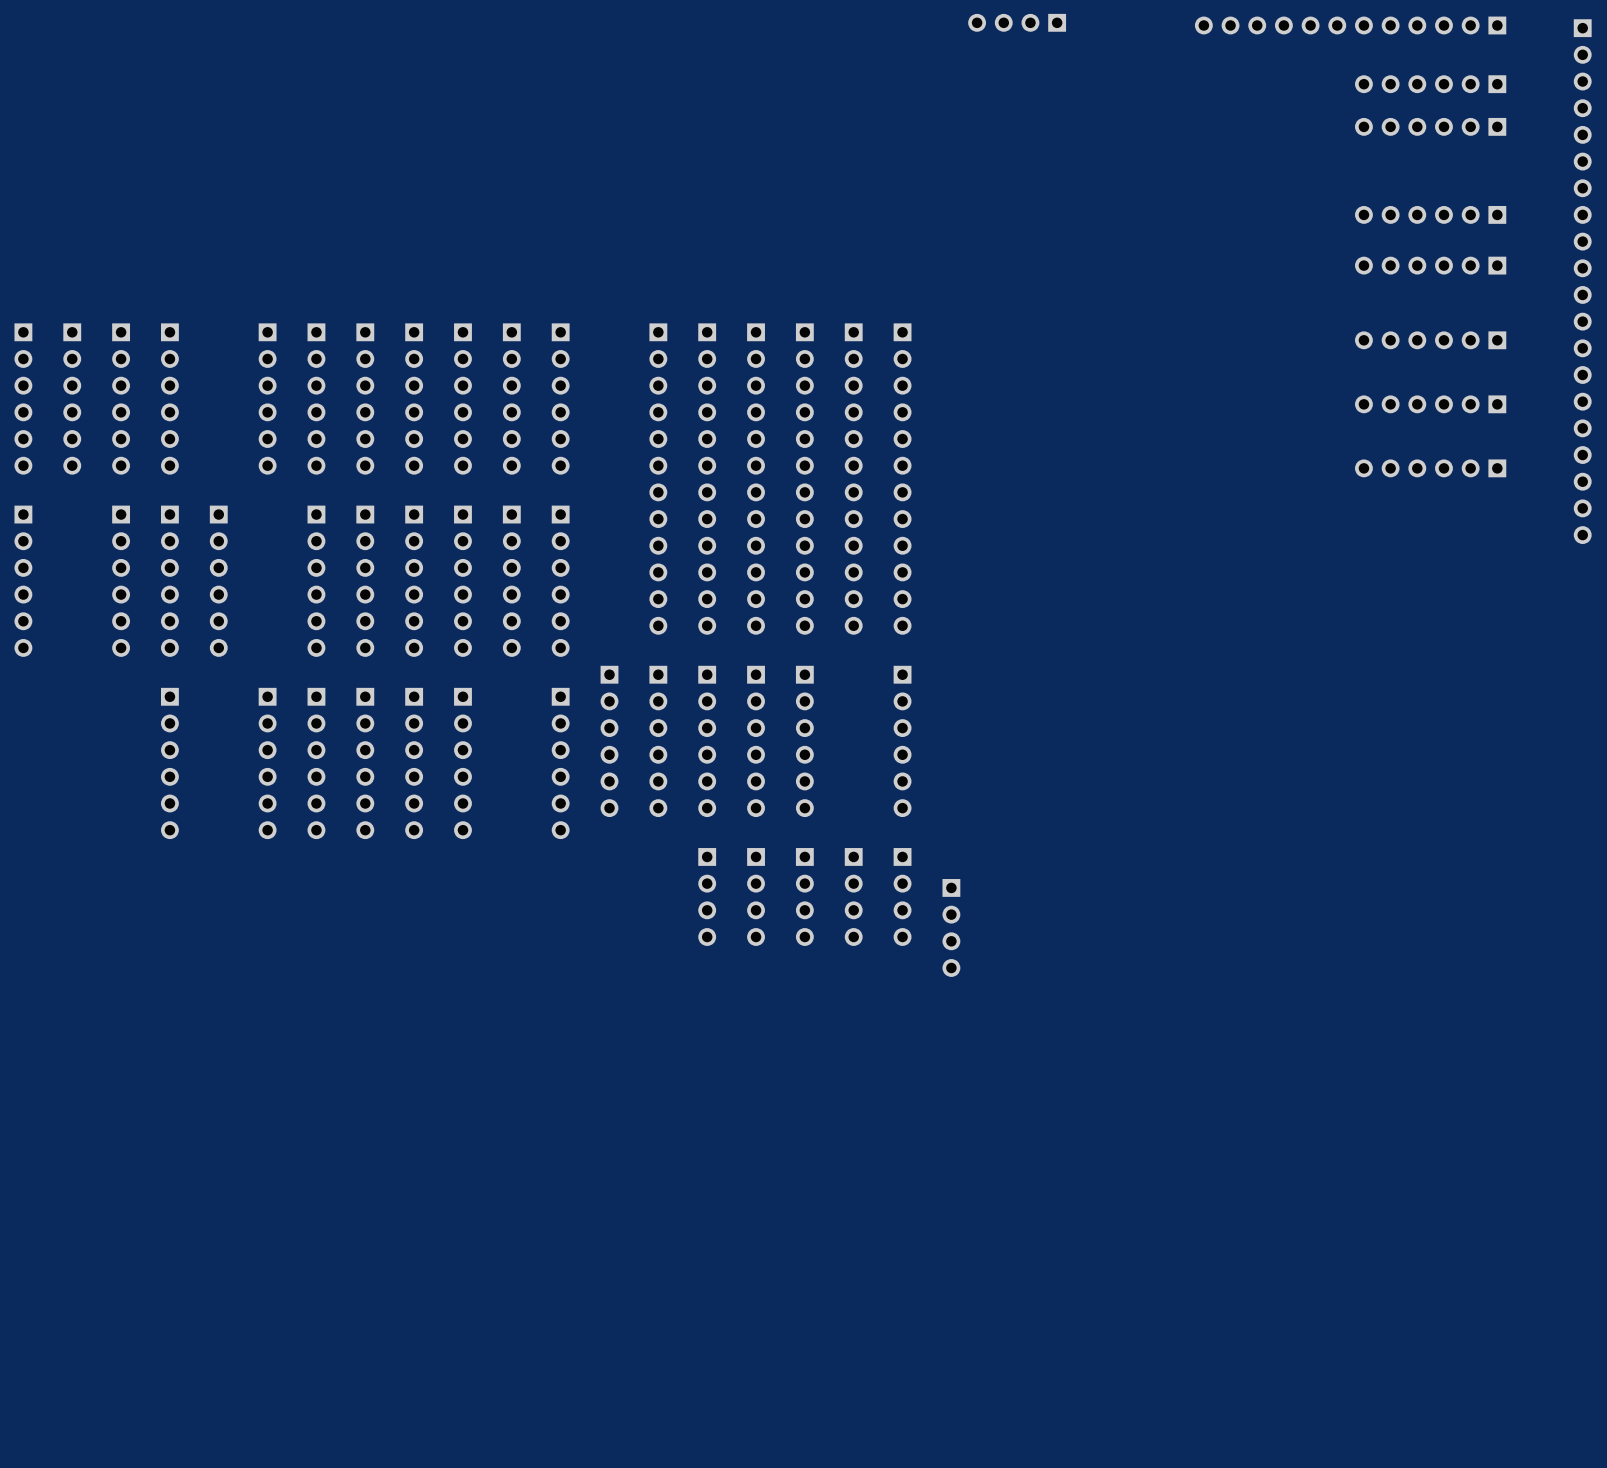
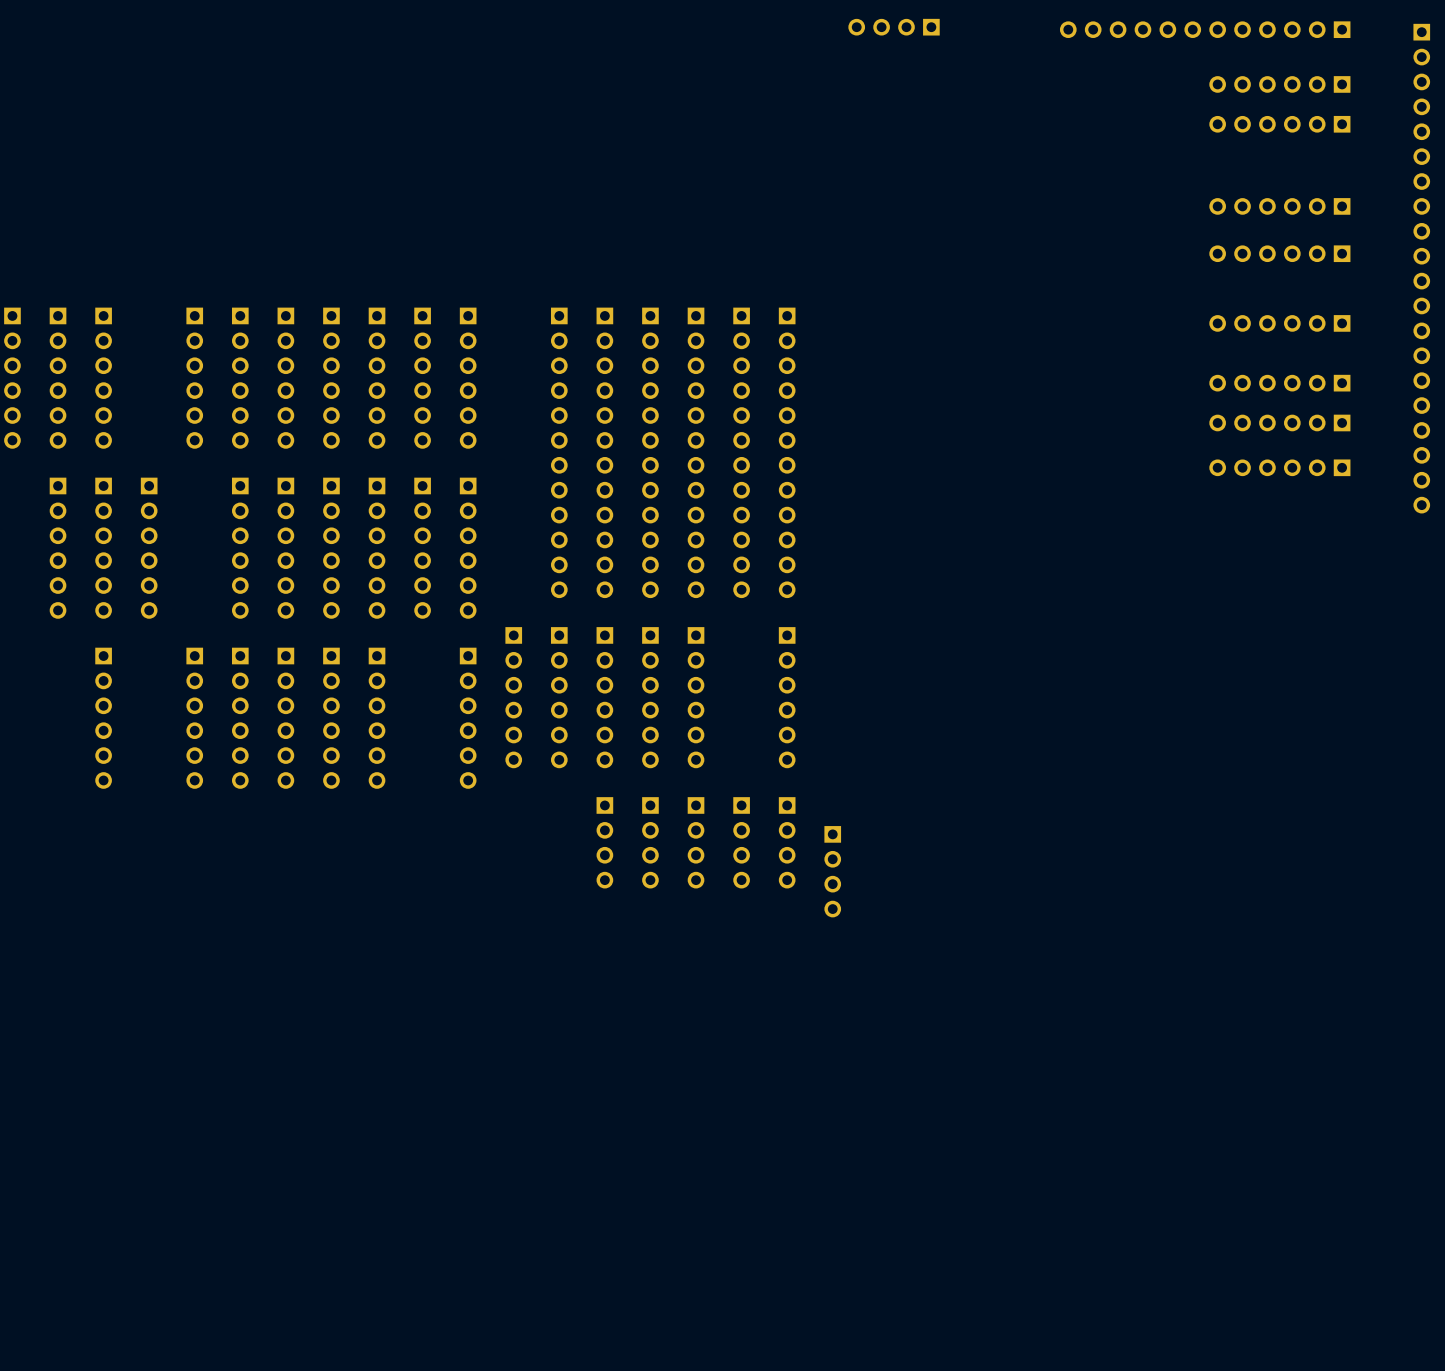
part: none -> (1279, 422)
part: (1430, 468) -> none
part: none -> (1279, 467)

